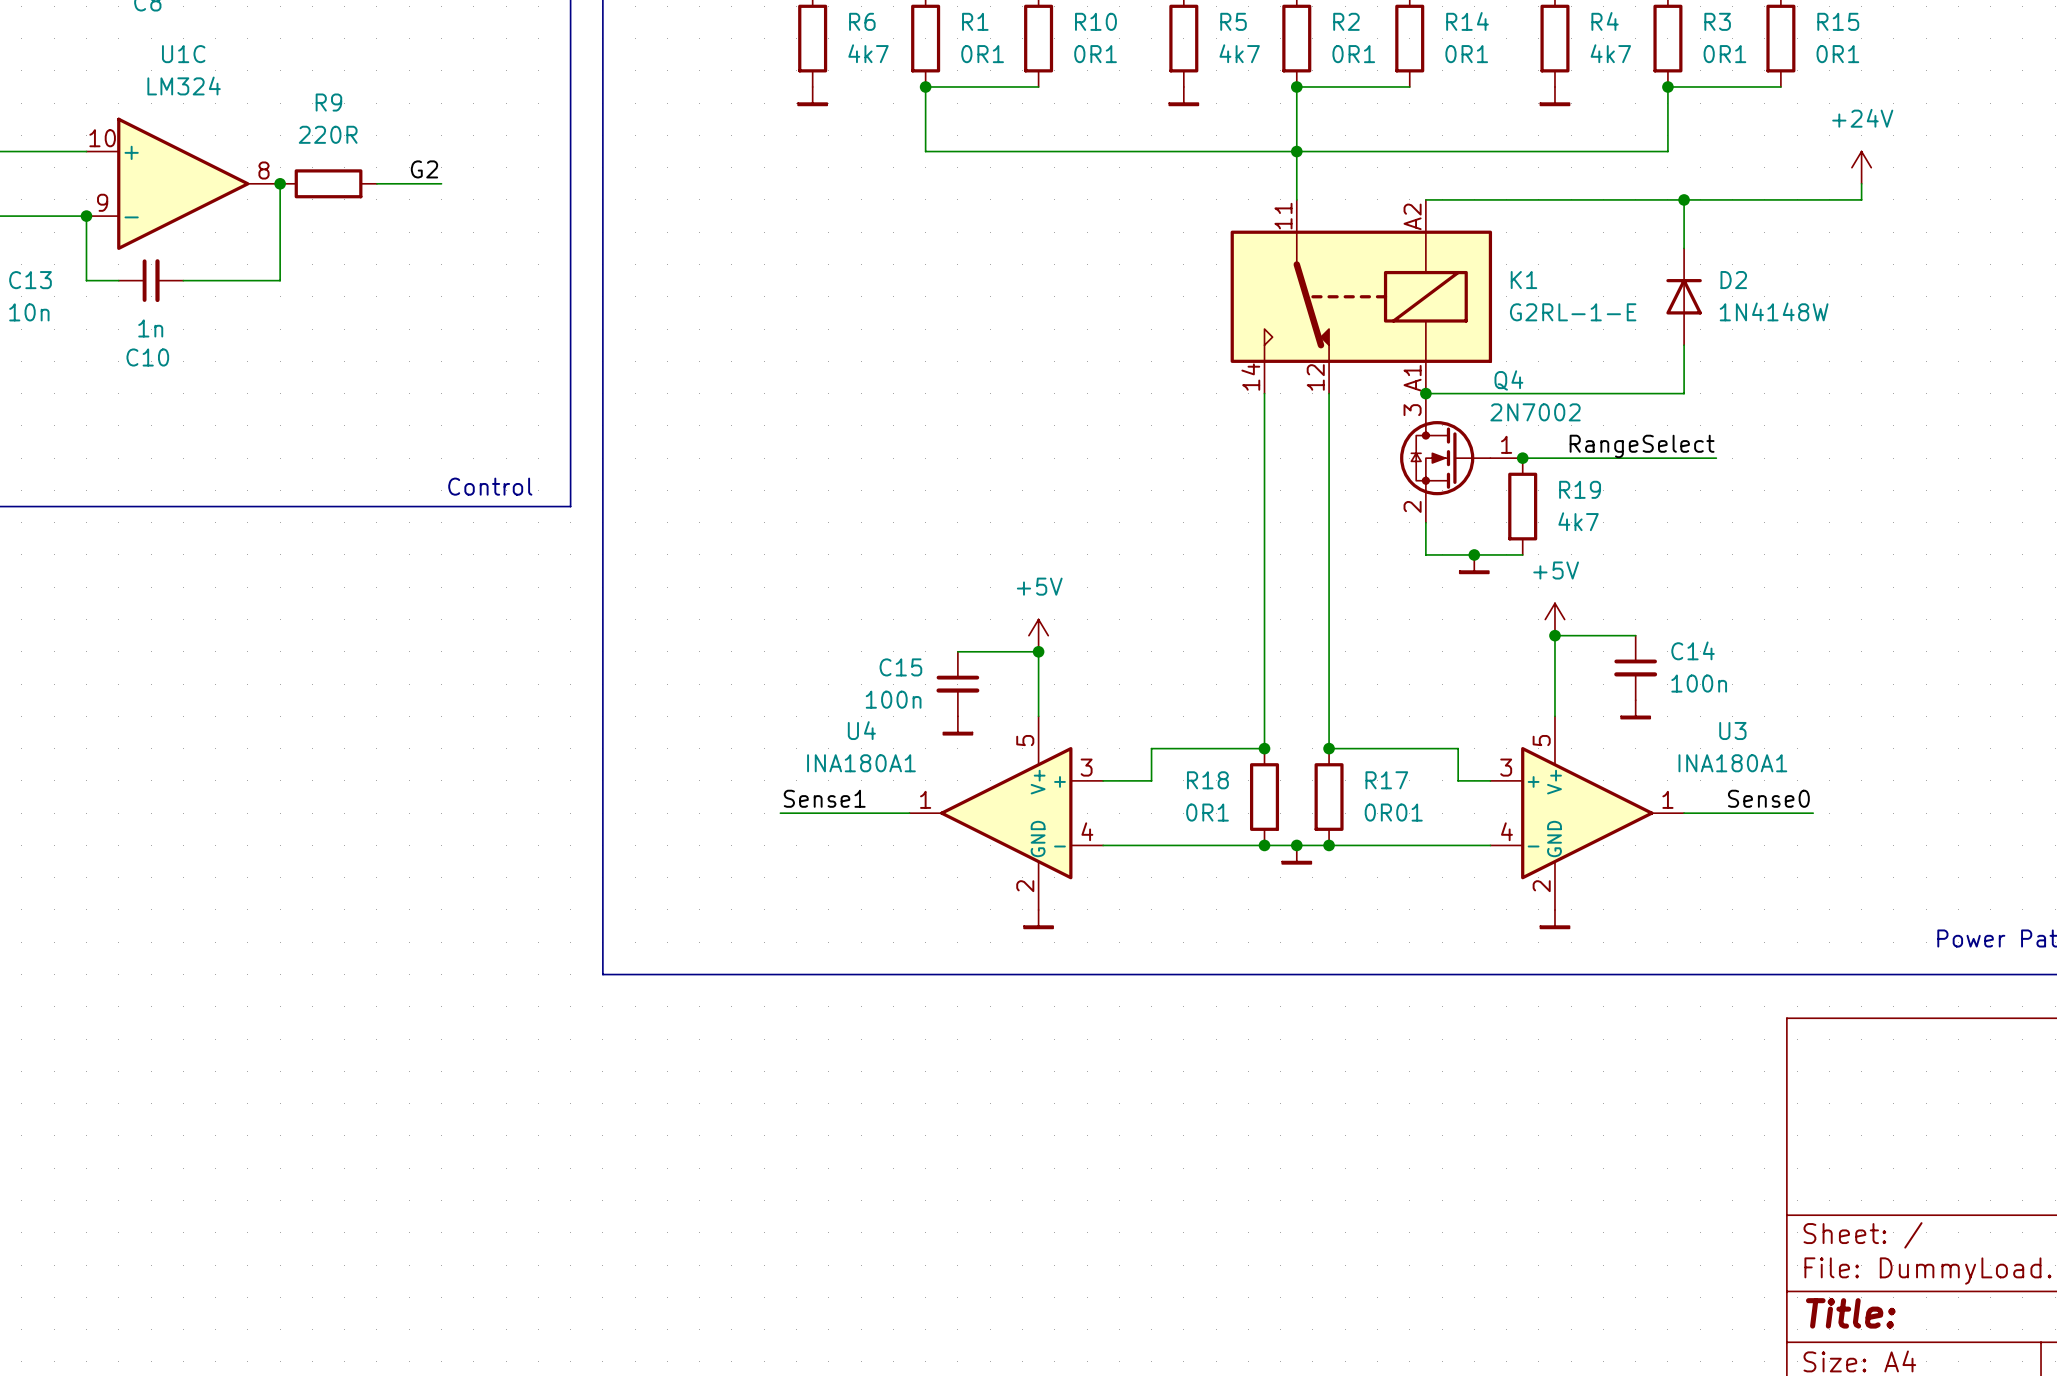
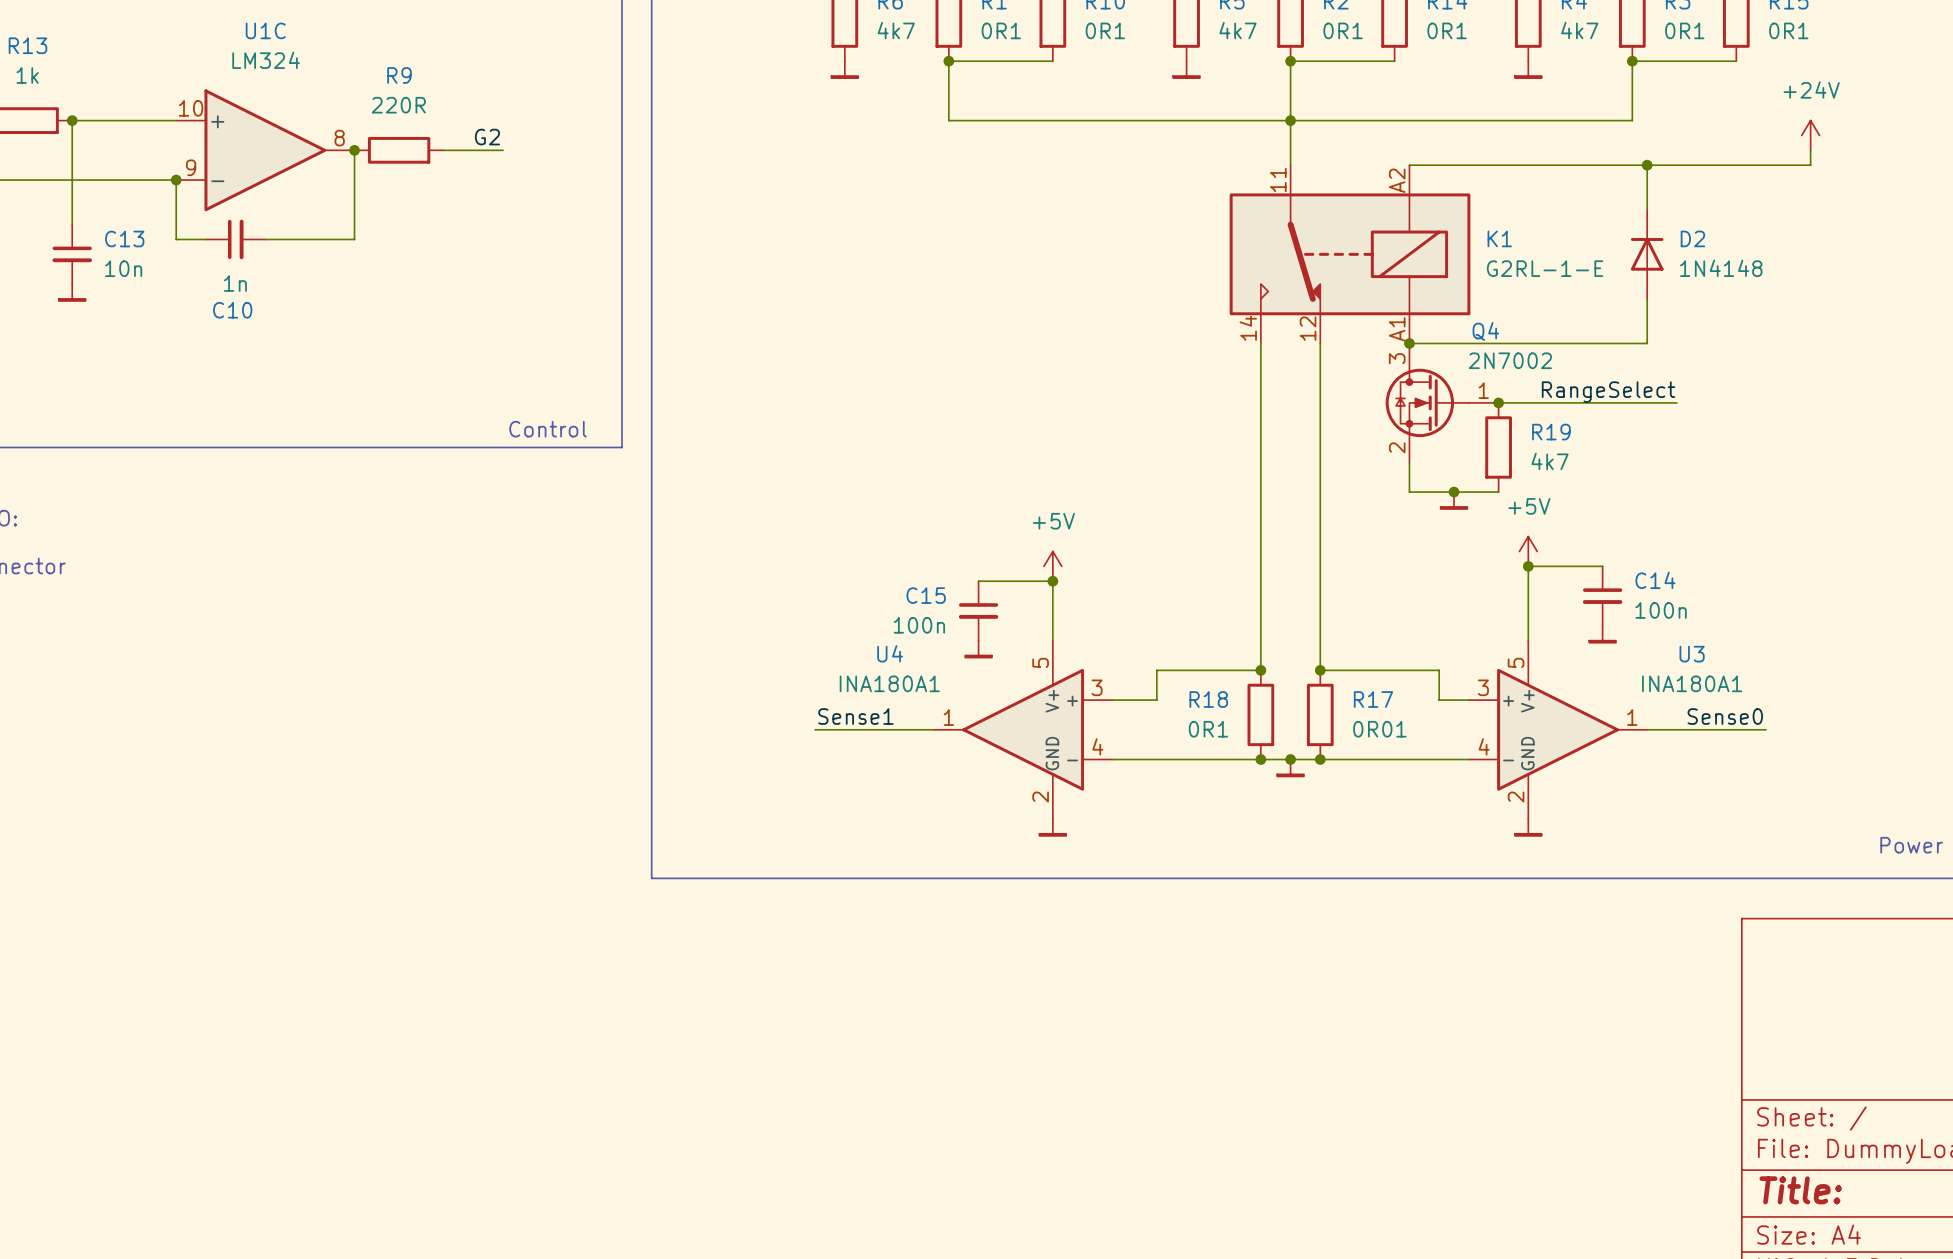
D2 value: 1N4148W (1774, 311) -> 1N4148 (1721, 268)

